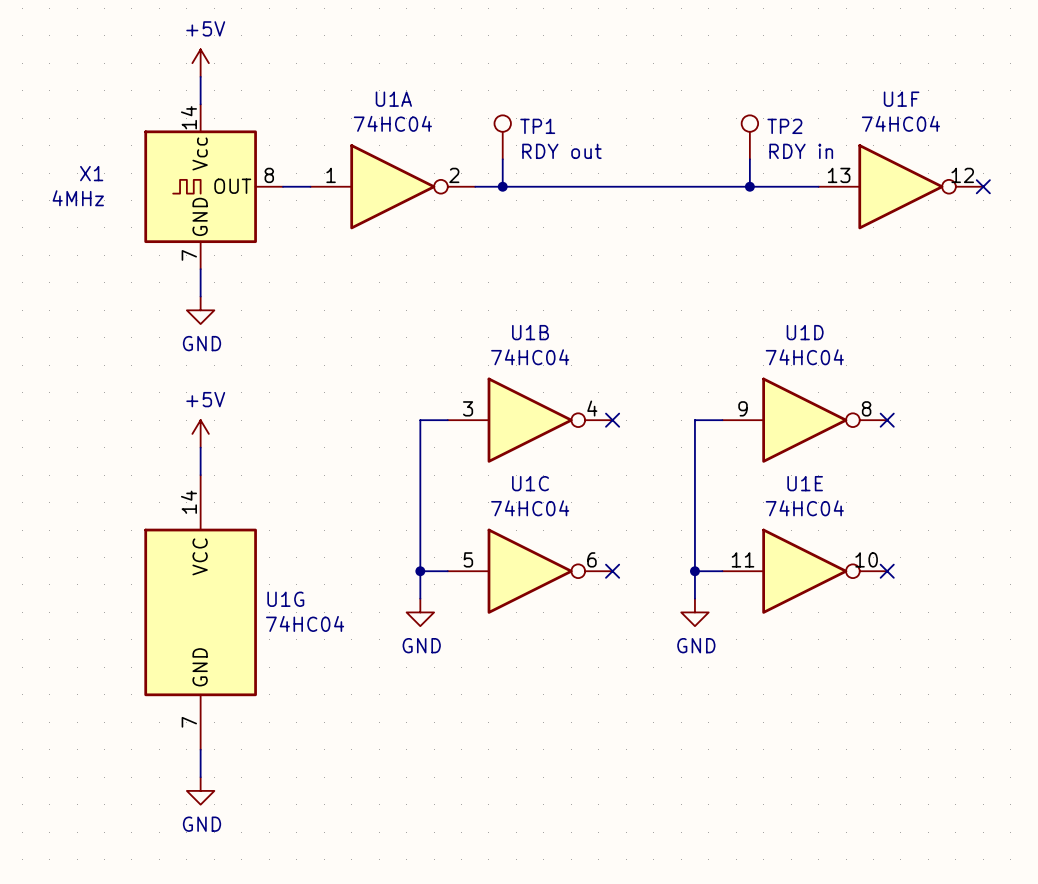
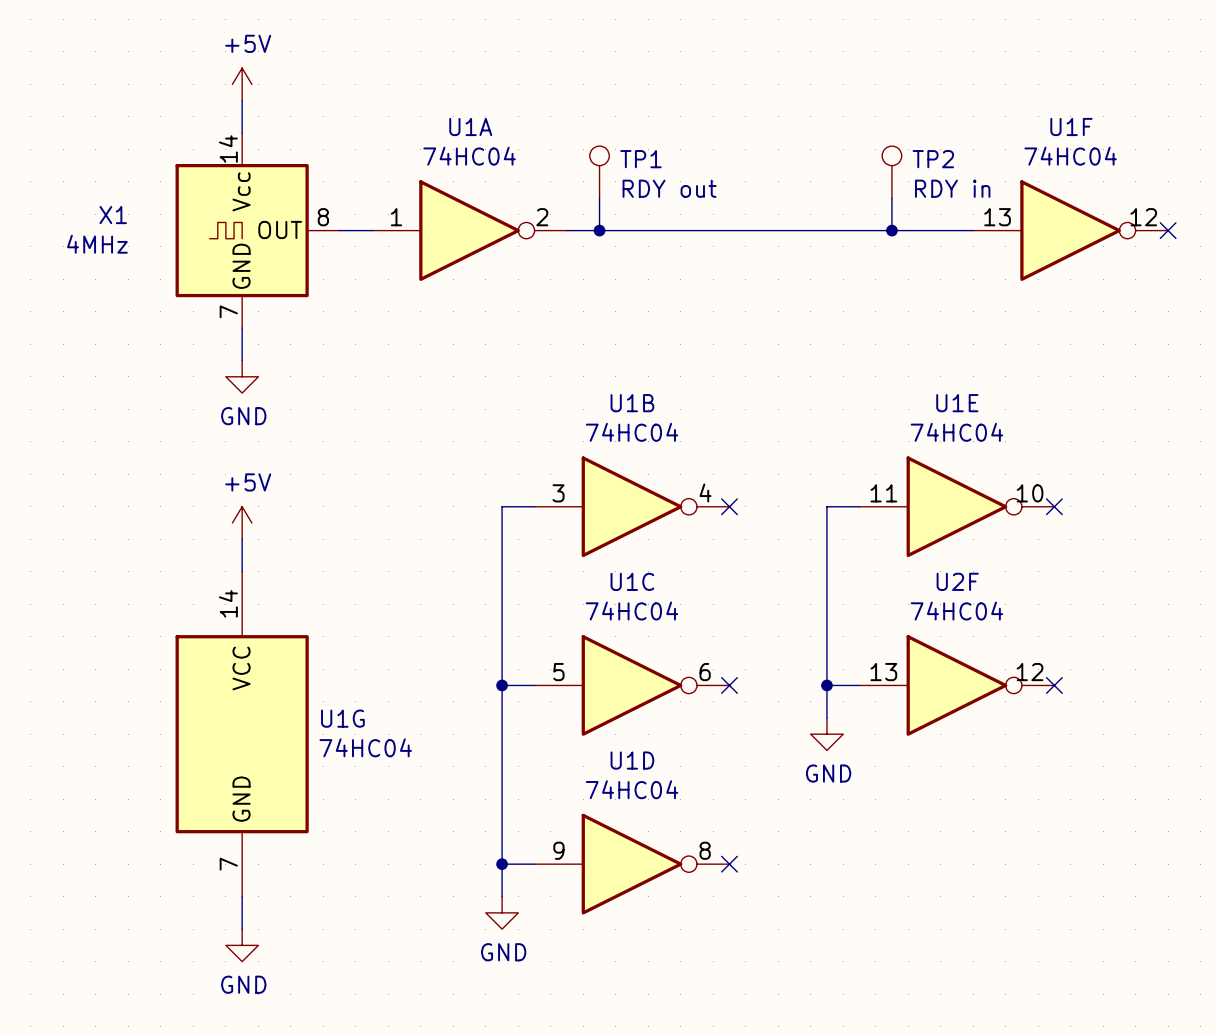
U1D position: (804, 420) -> (632, 864)
U1E position: (804, 571) -> (956, 506)
U2F: none -> 74HC04 (956, 685)
wire: none -> (502, 717) (502, 896)
power symbol position: GND (420, 612) -> GND (502, 912)
wire: none -> (502, 864) (534, 864)
junction: none -> (502, 864)
no-connect mark: none -> (729, 864)

